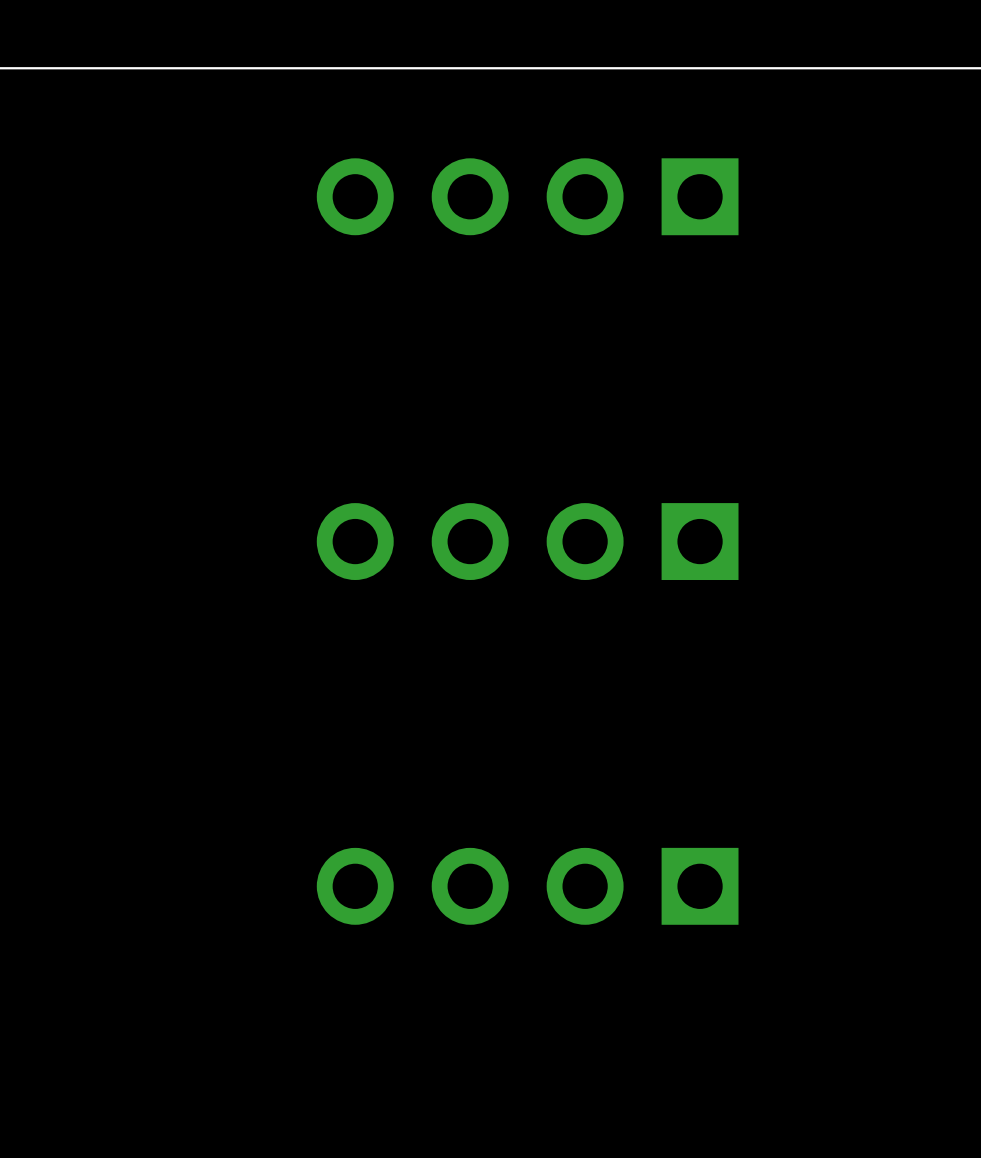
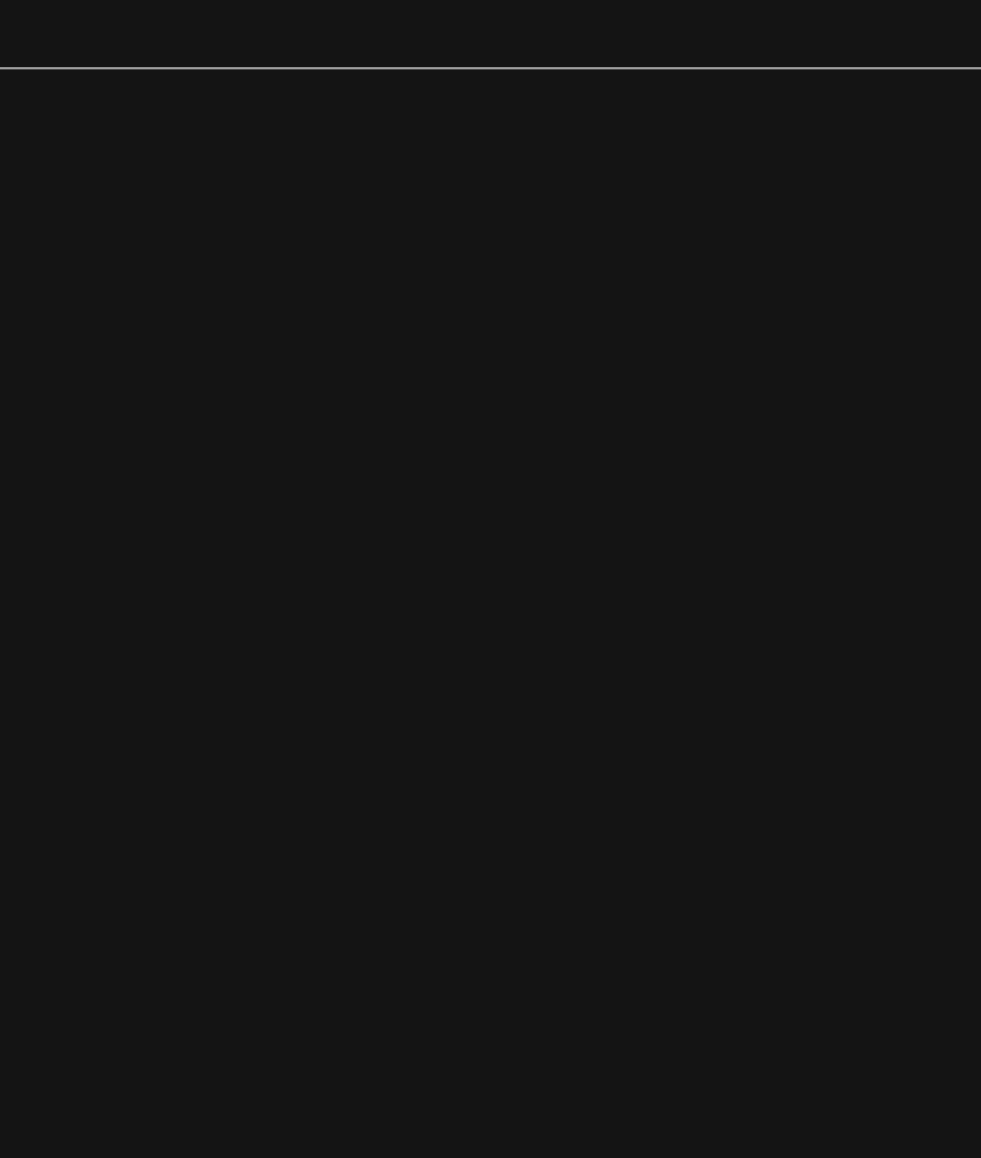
part: (527, 196) -> none
part: (527, 541) -> none
part: (527, 886) -> none

